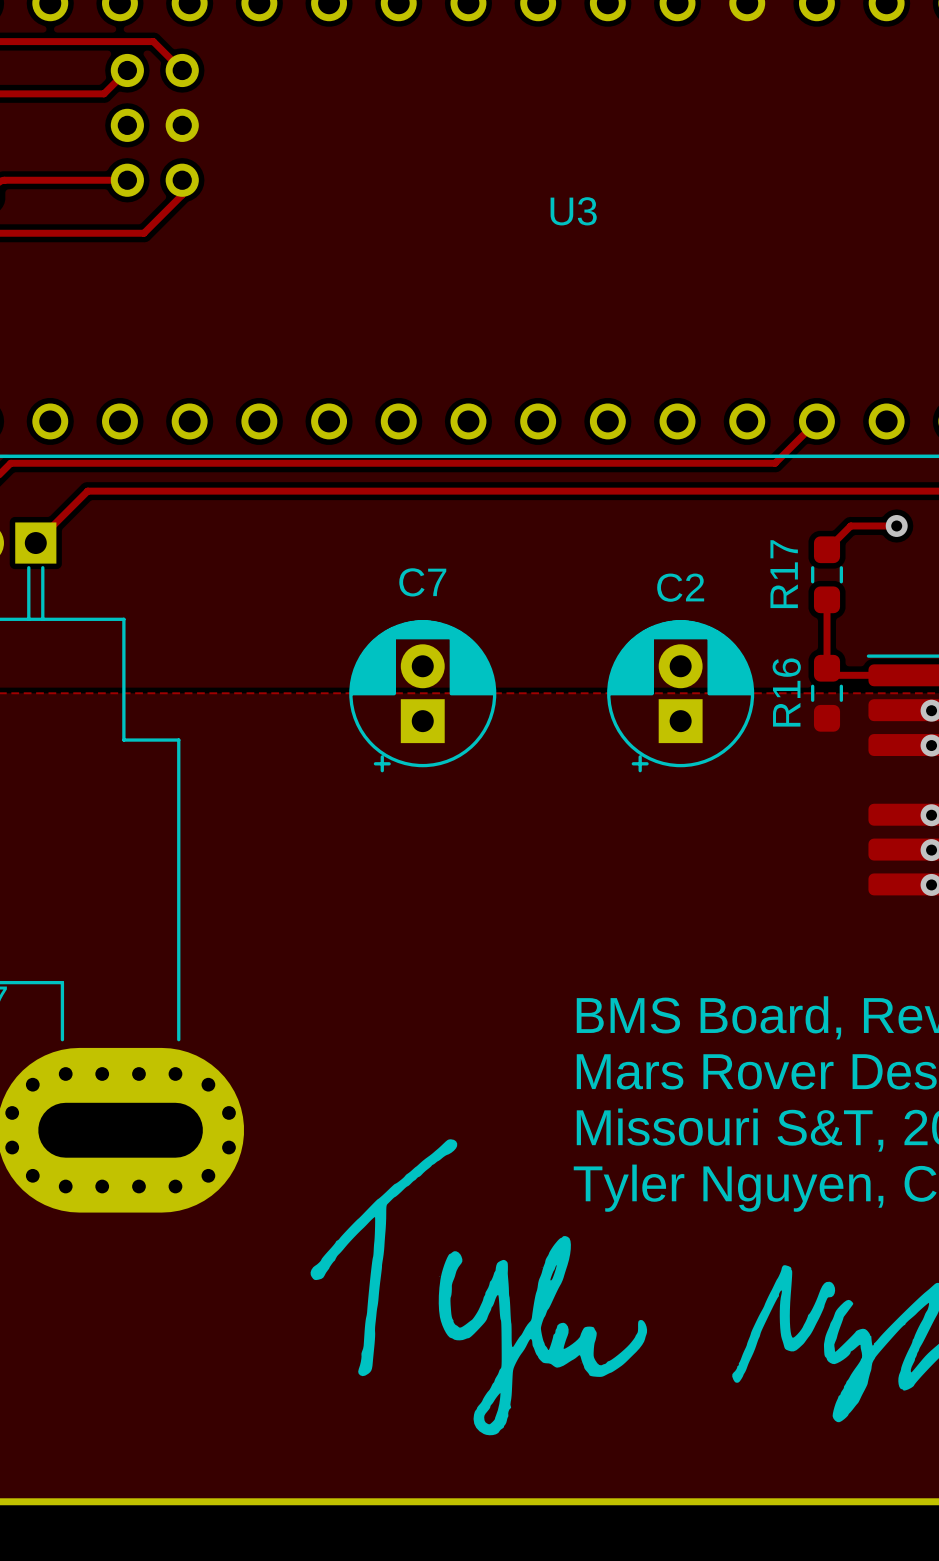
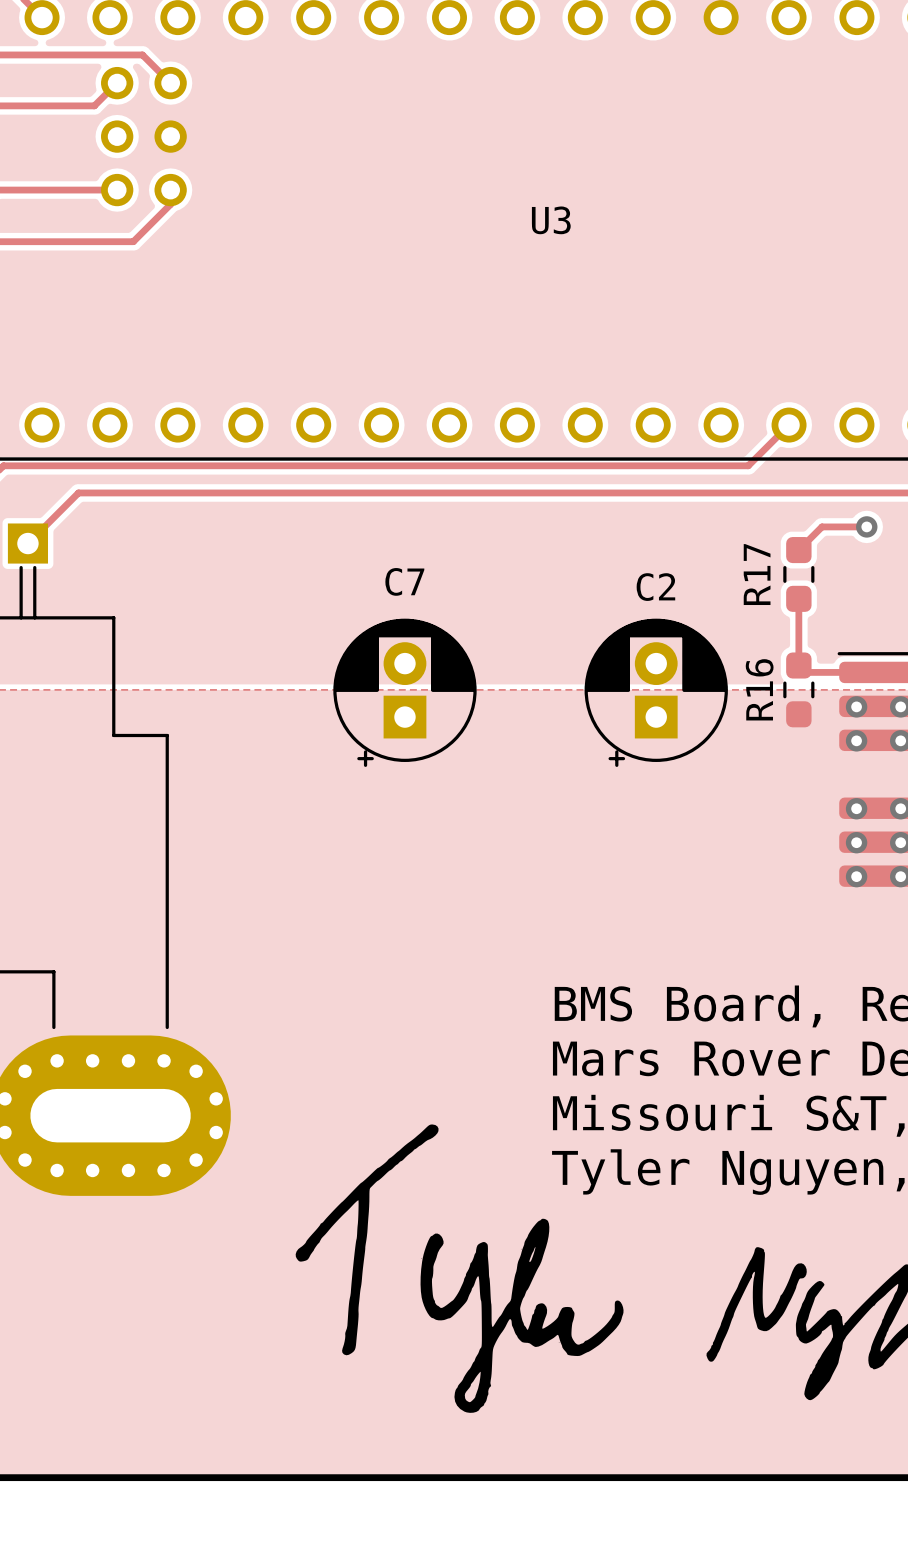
via: none -> (856, 706)
via: none -> (856, 740)
via: none -> (856, 808)
via: none -> (856, 842)
via: none -> (856, 876)

